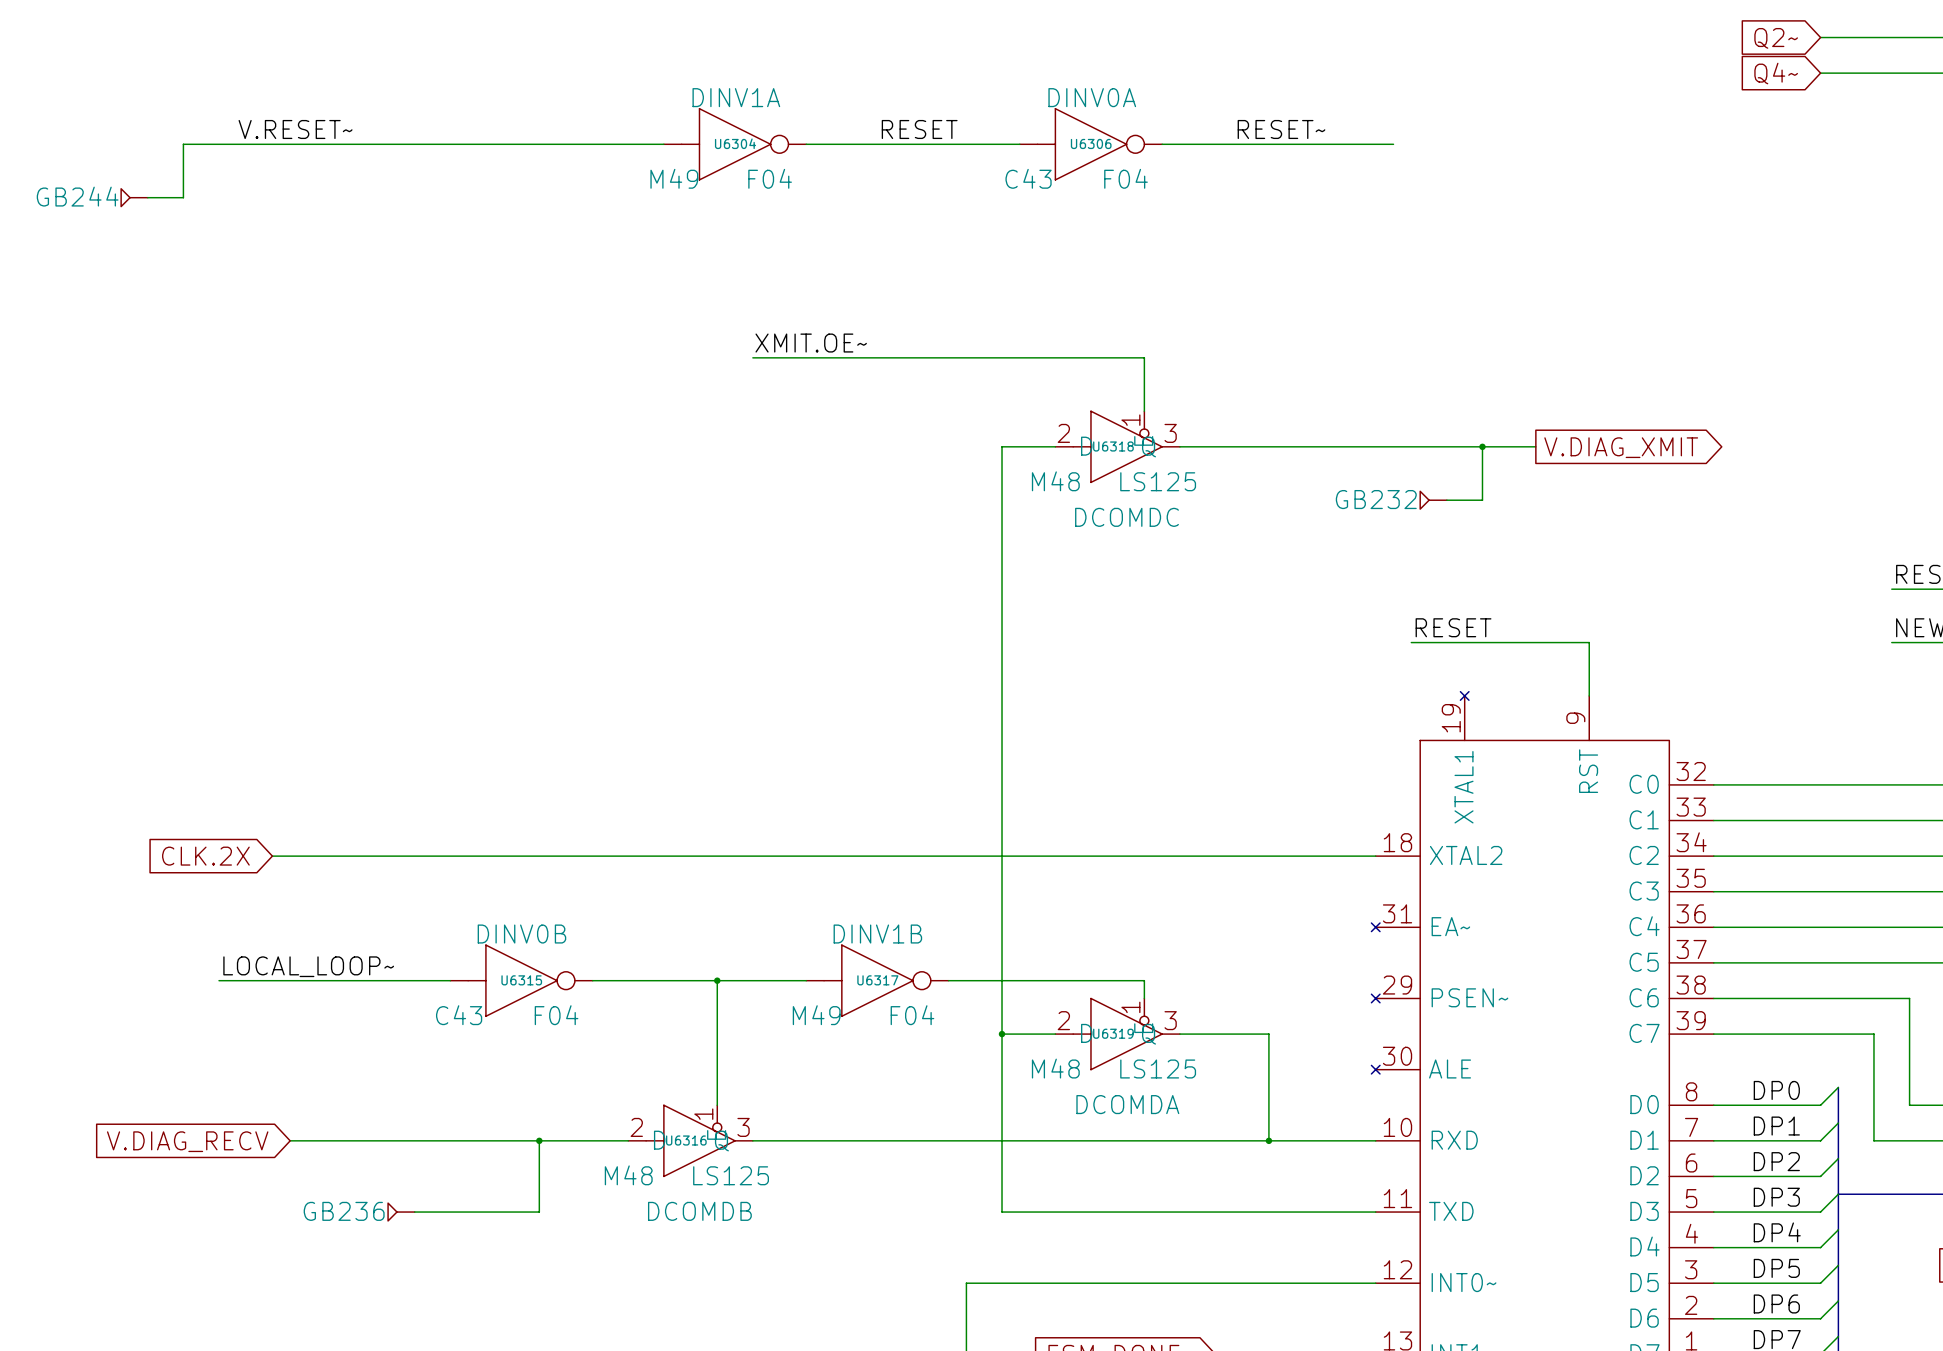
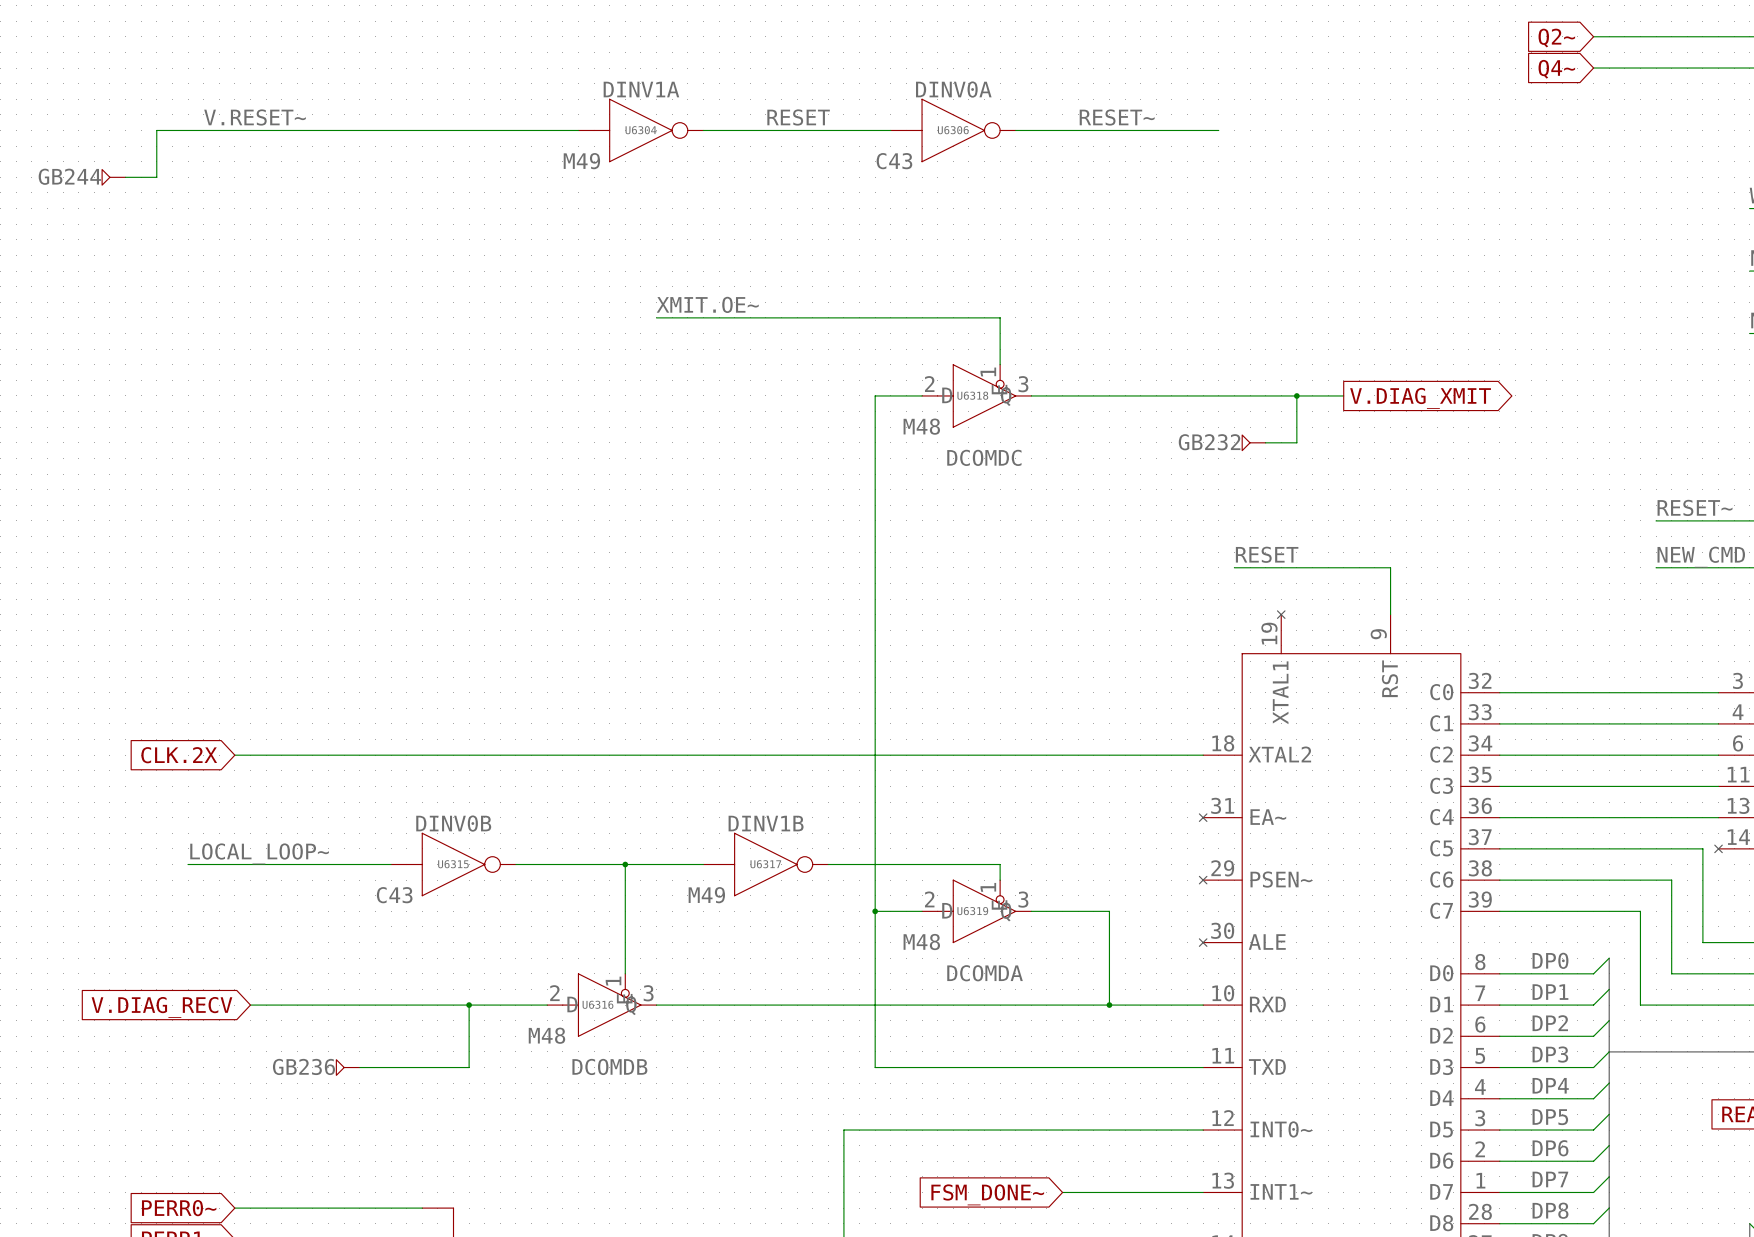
U6304 value: F04 (770, 178) -> none
U6306 value: F04 (1126, 178) -> none
U6318 value: LS125 (1158, 481) -> none
U6315 value: F04 (556, 1015) -> none
U6317 value: F04 (912, 1015) -> none
U6319 value: LS125 (1158, 1069) -> none
U6316 value: LS125 (731, 1175) -> none

